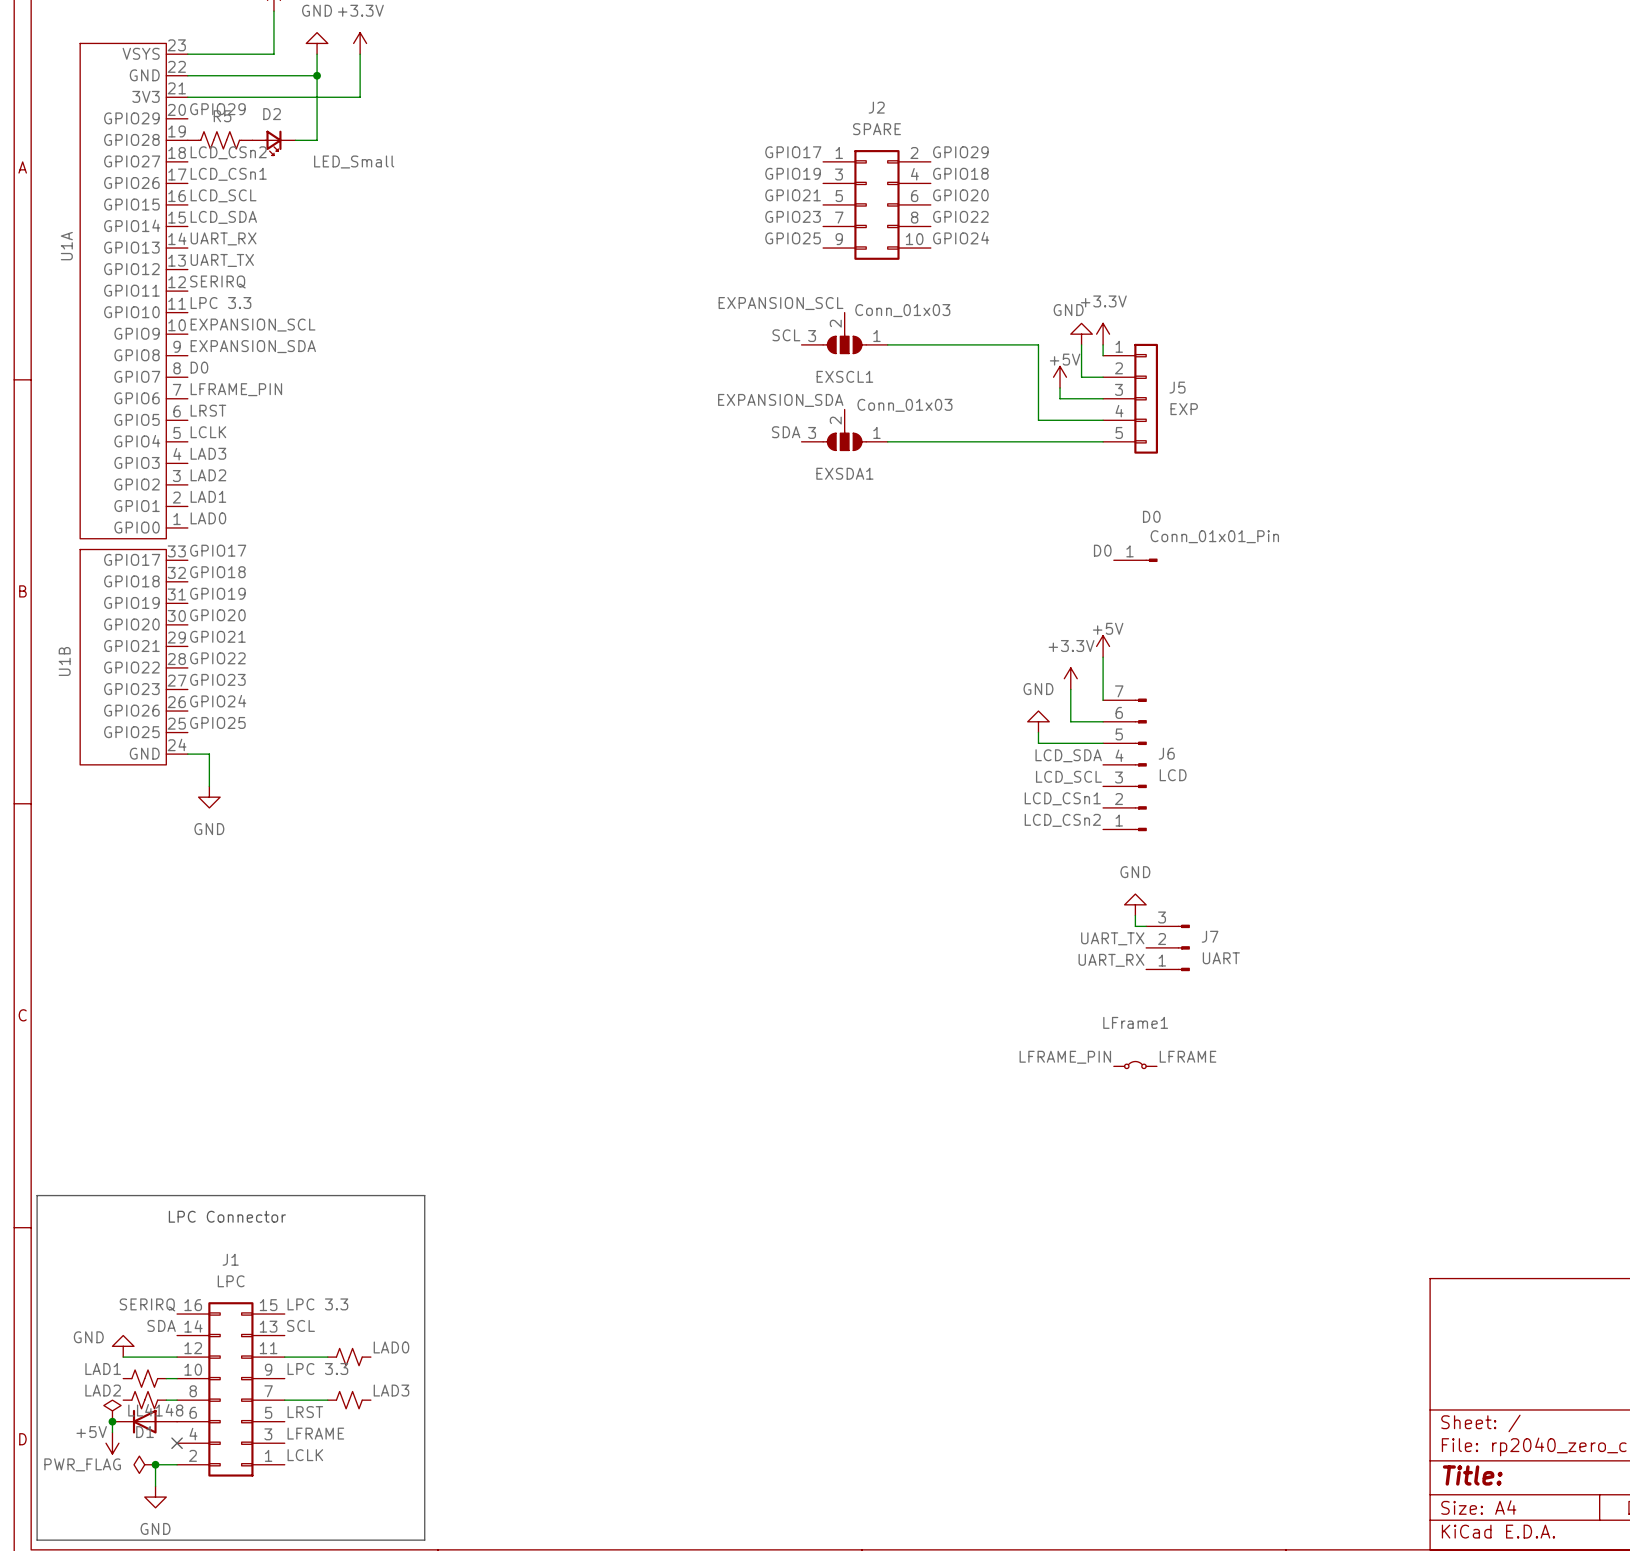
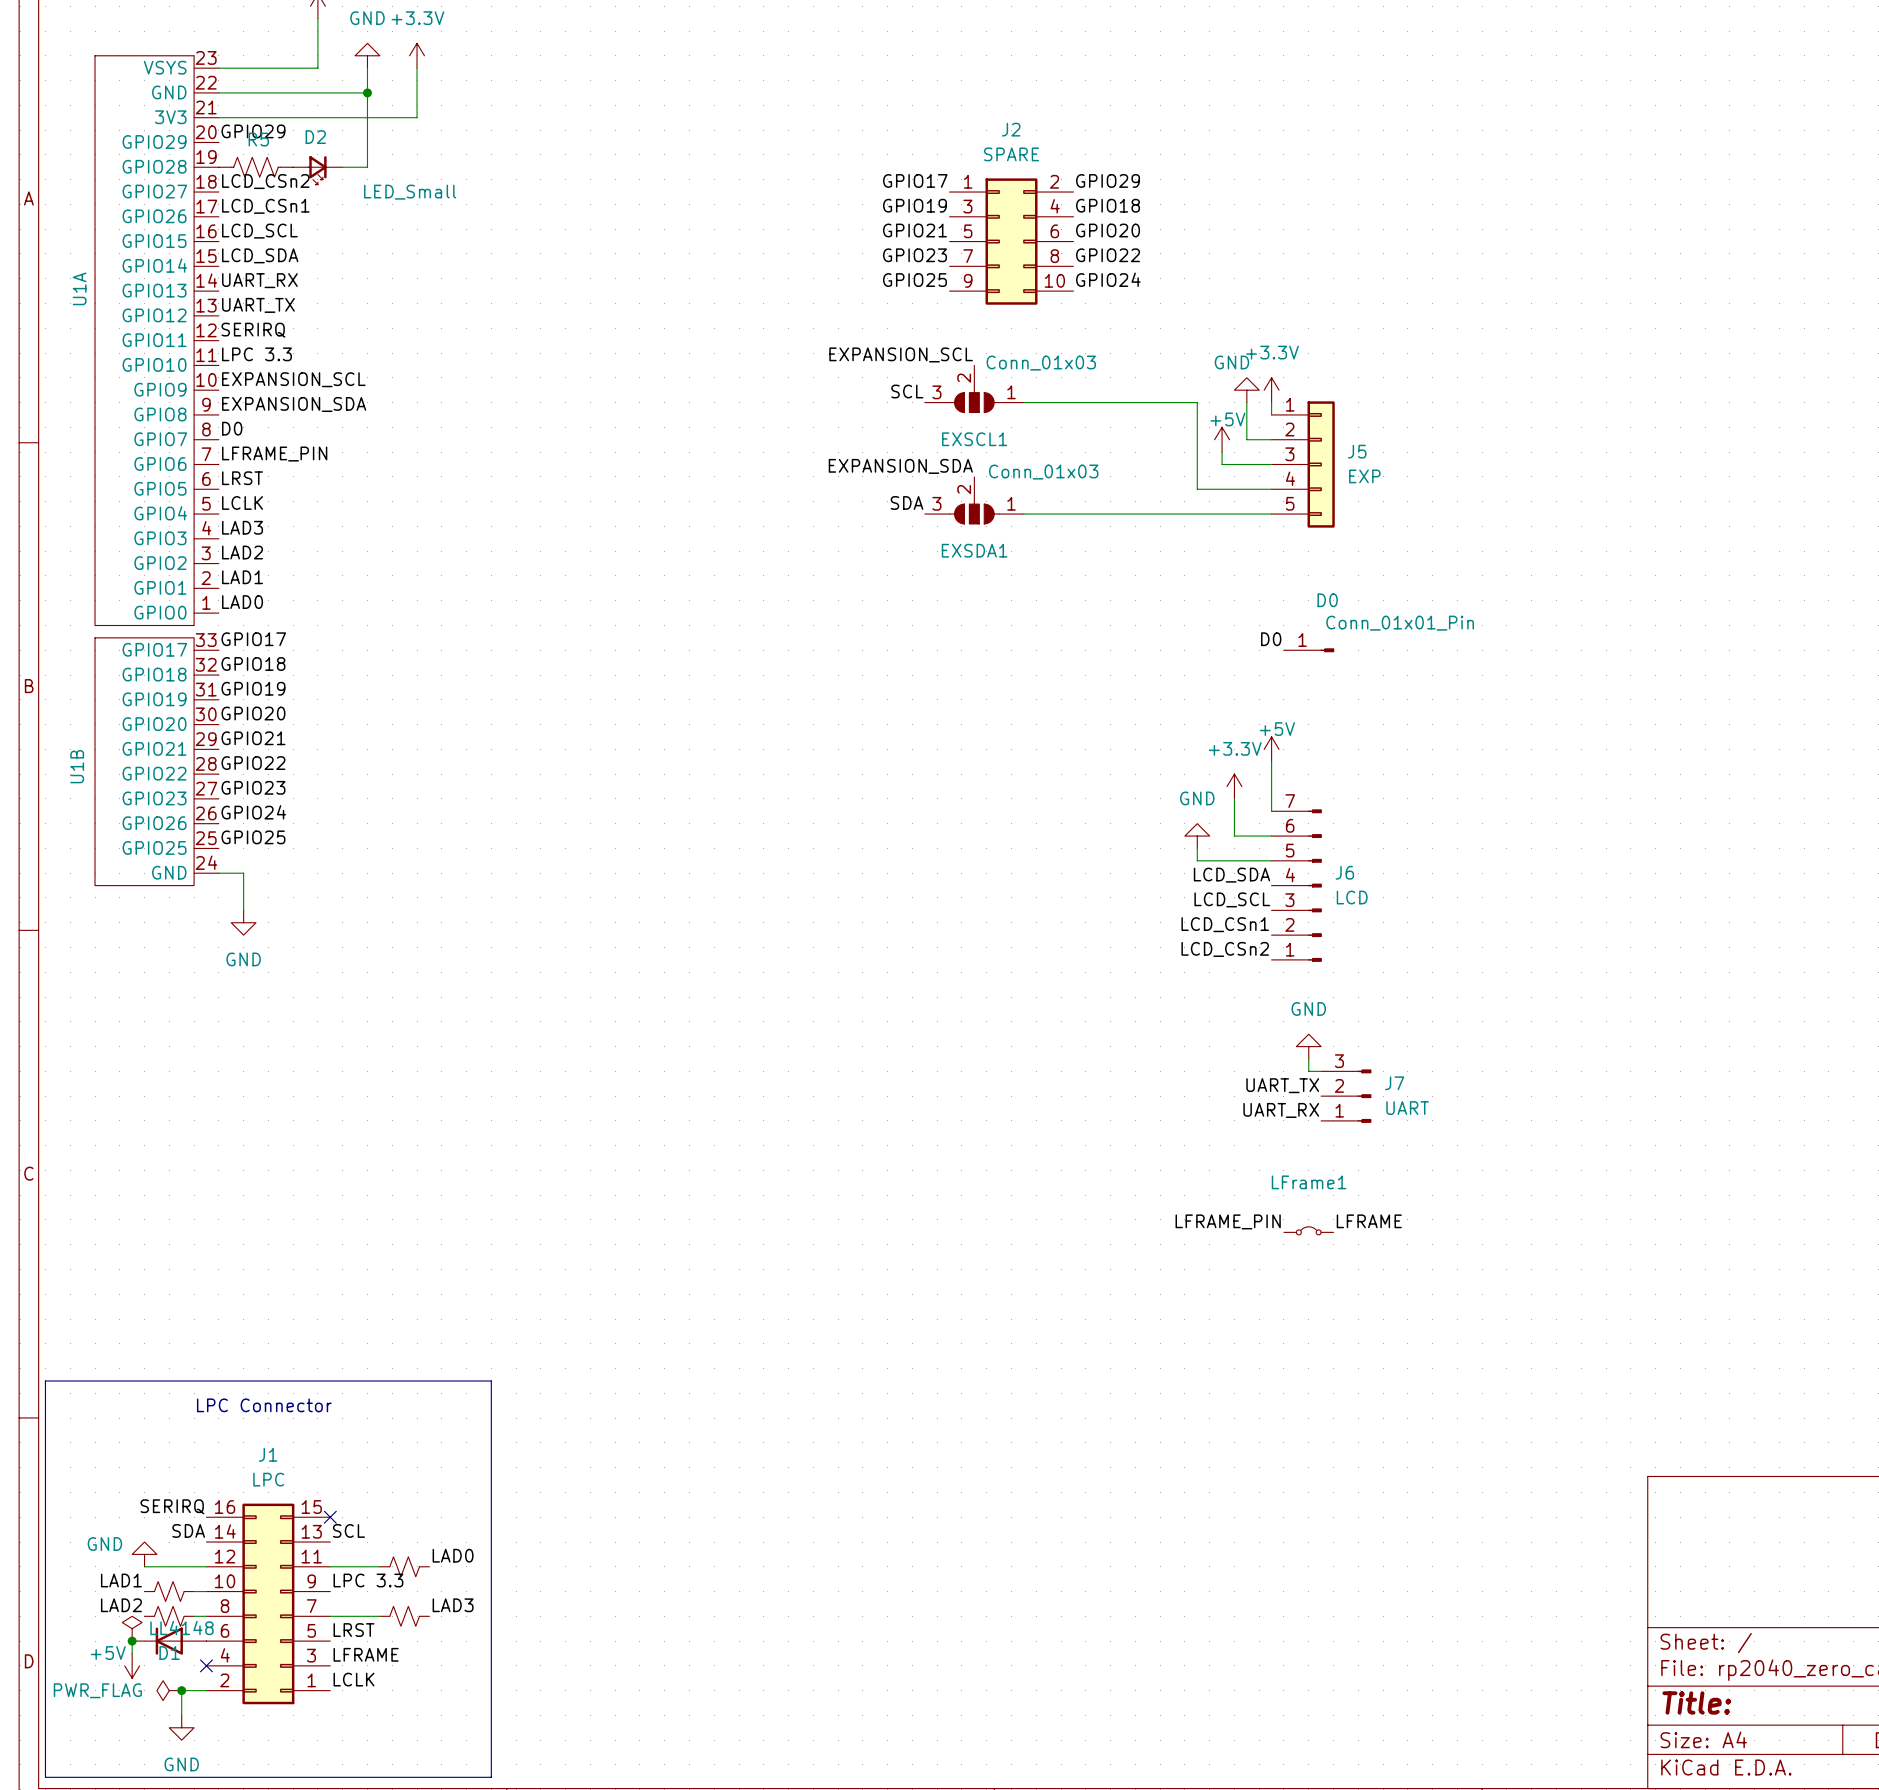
label: LPC 3.3 (317, 1304) -> none
no-connect mark: none -> (330, 1517)

